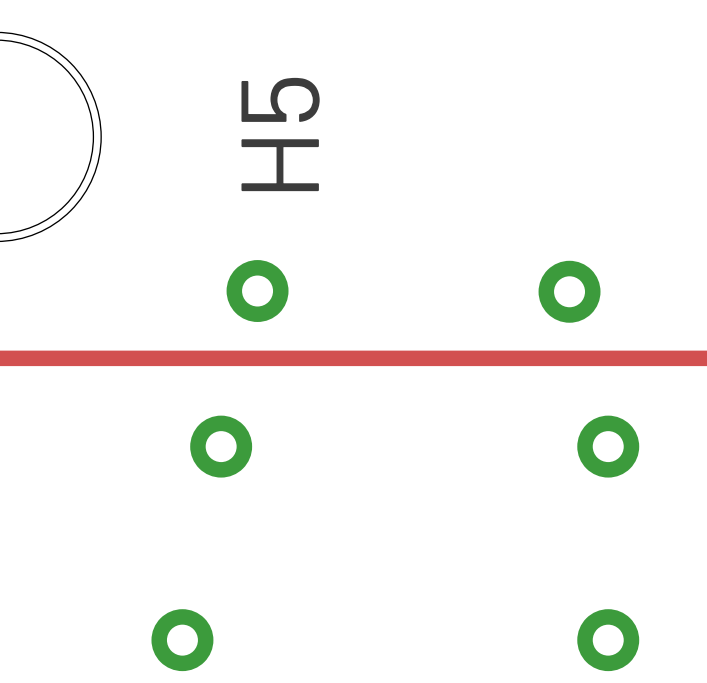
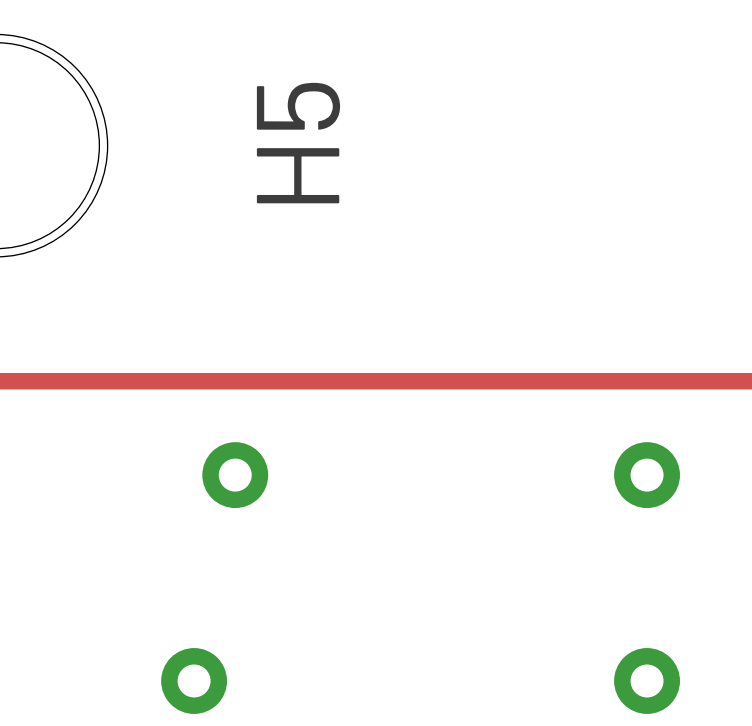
via: (257, 291) -> none
via: (569, 291) -> none

